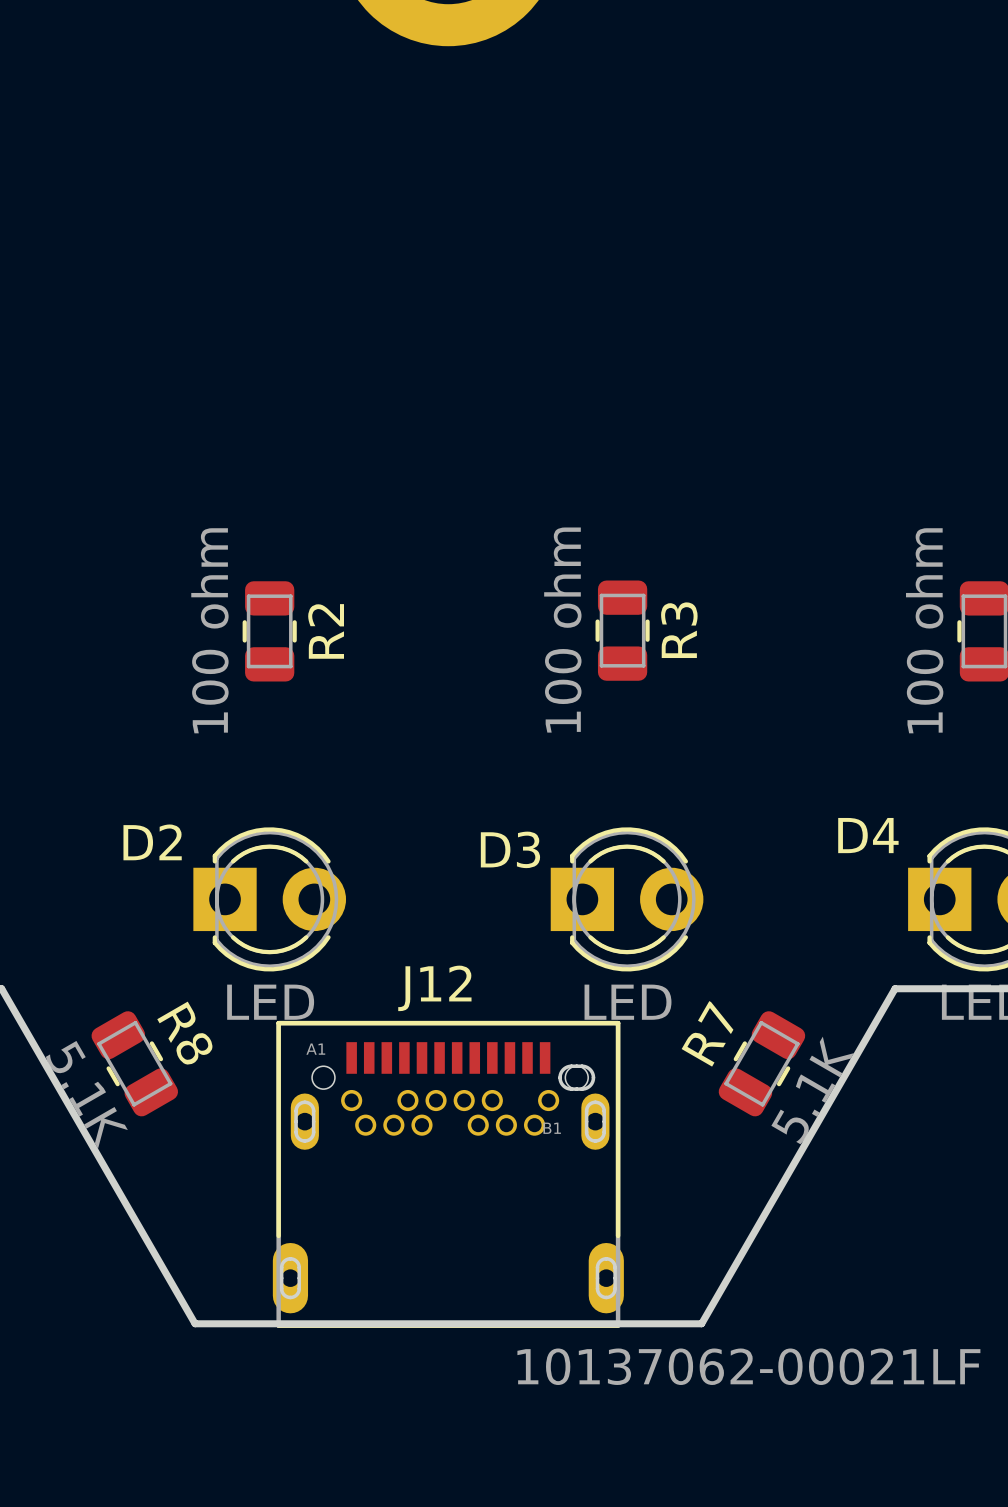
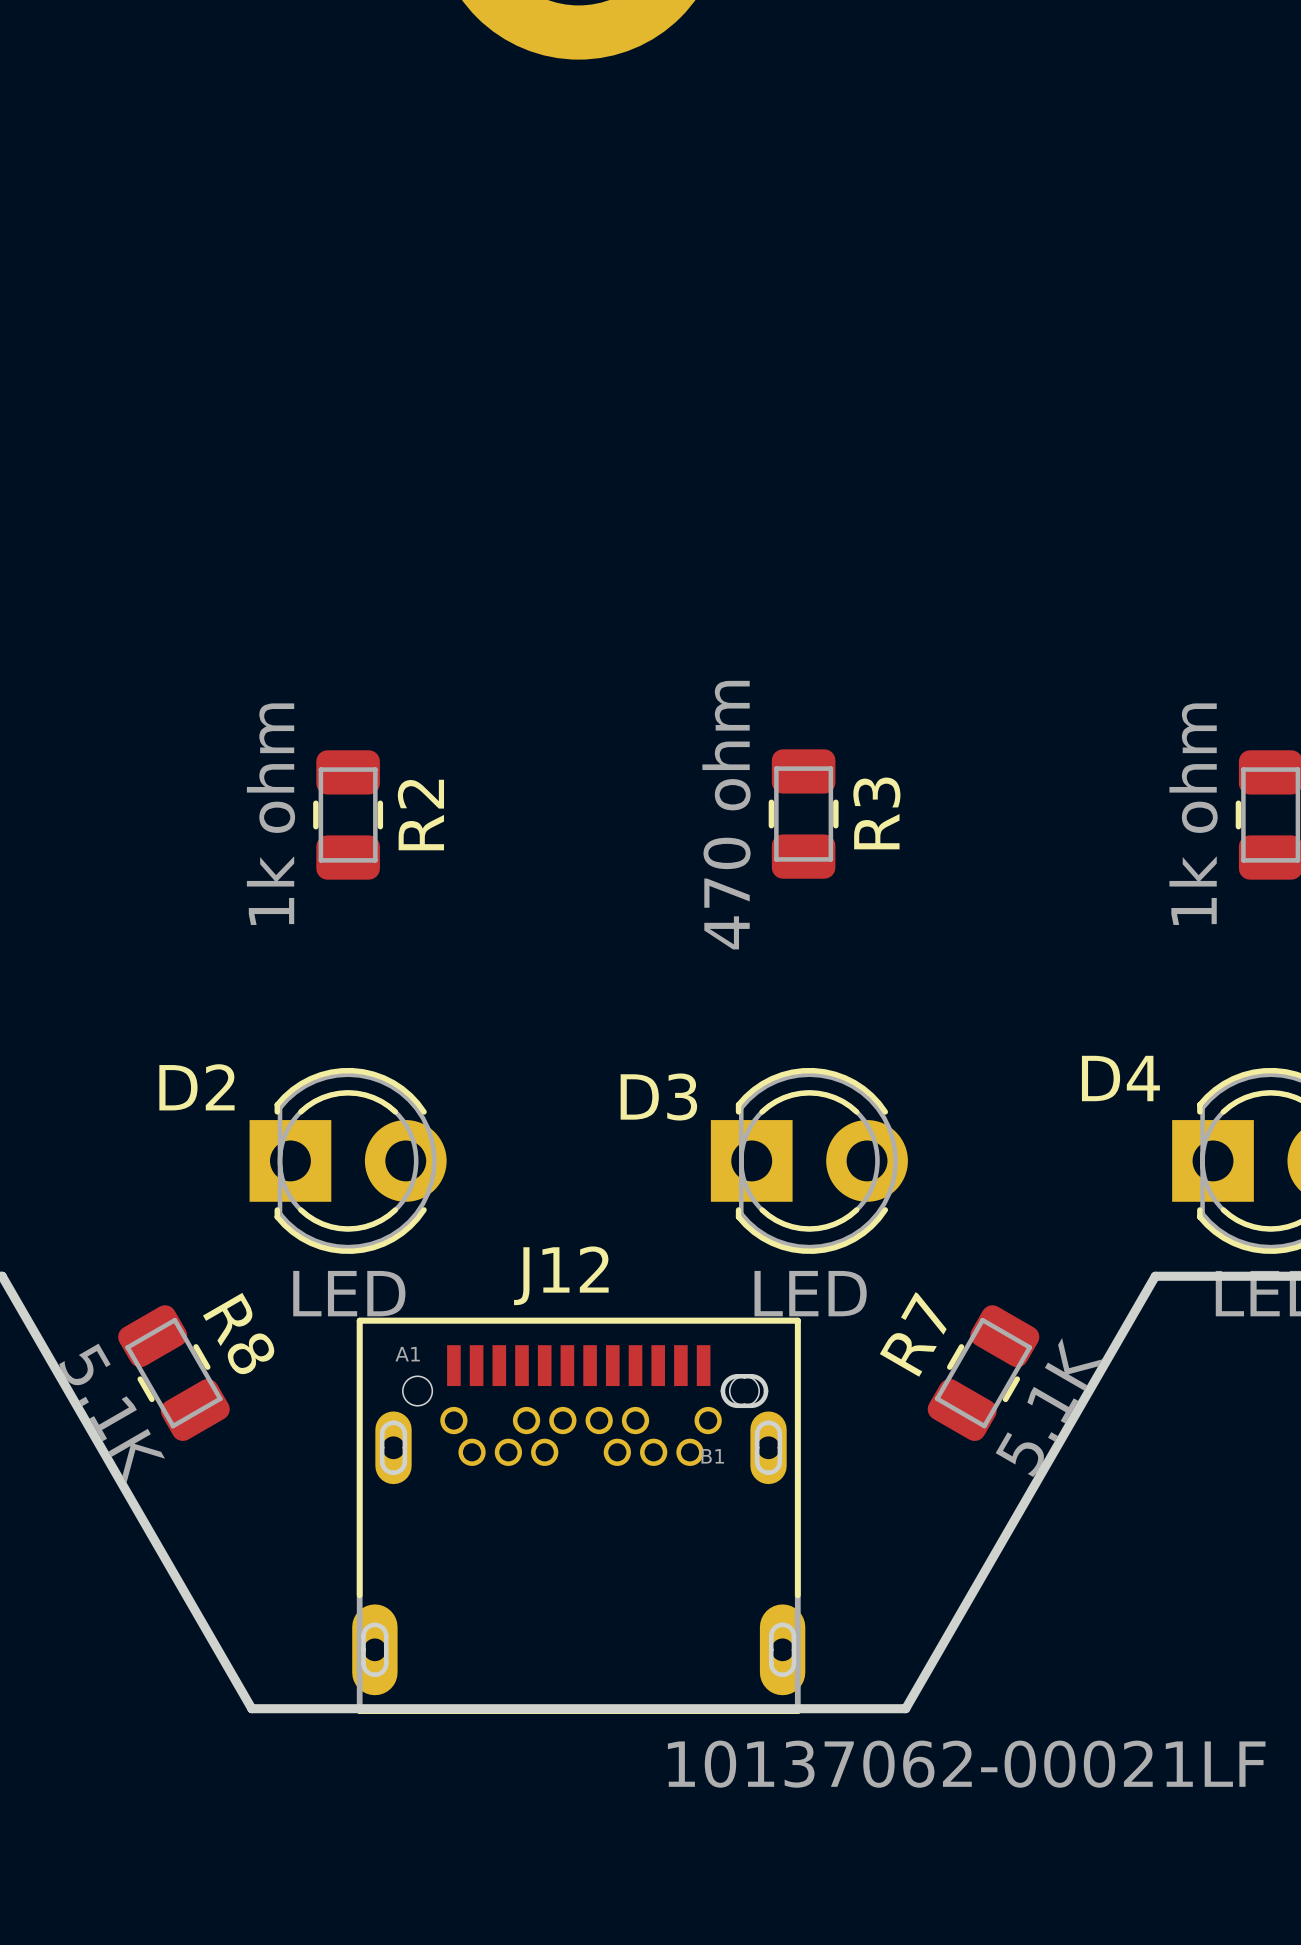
R2 value: 100 ohm (209, 630) -> 1k ohm (270, 814)
R3 value: 100 ohm (562, 630) -> 470 ohm (726, 815)
part value: 100 ohm (924, 630) -> 1k ohm (1193, 814)

